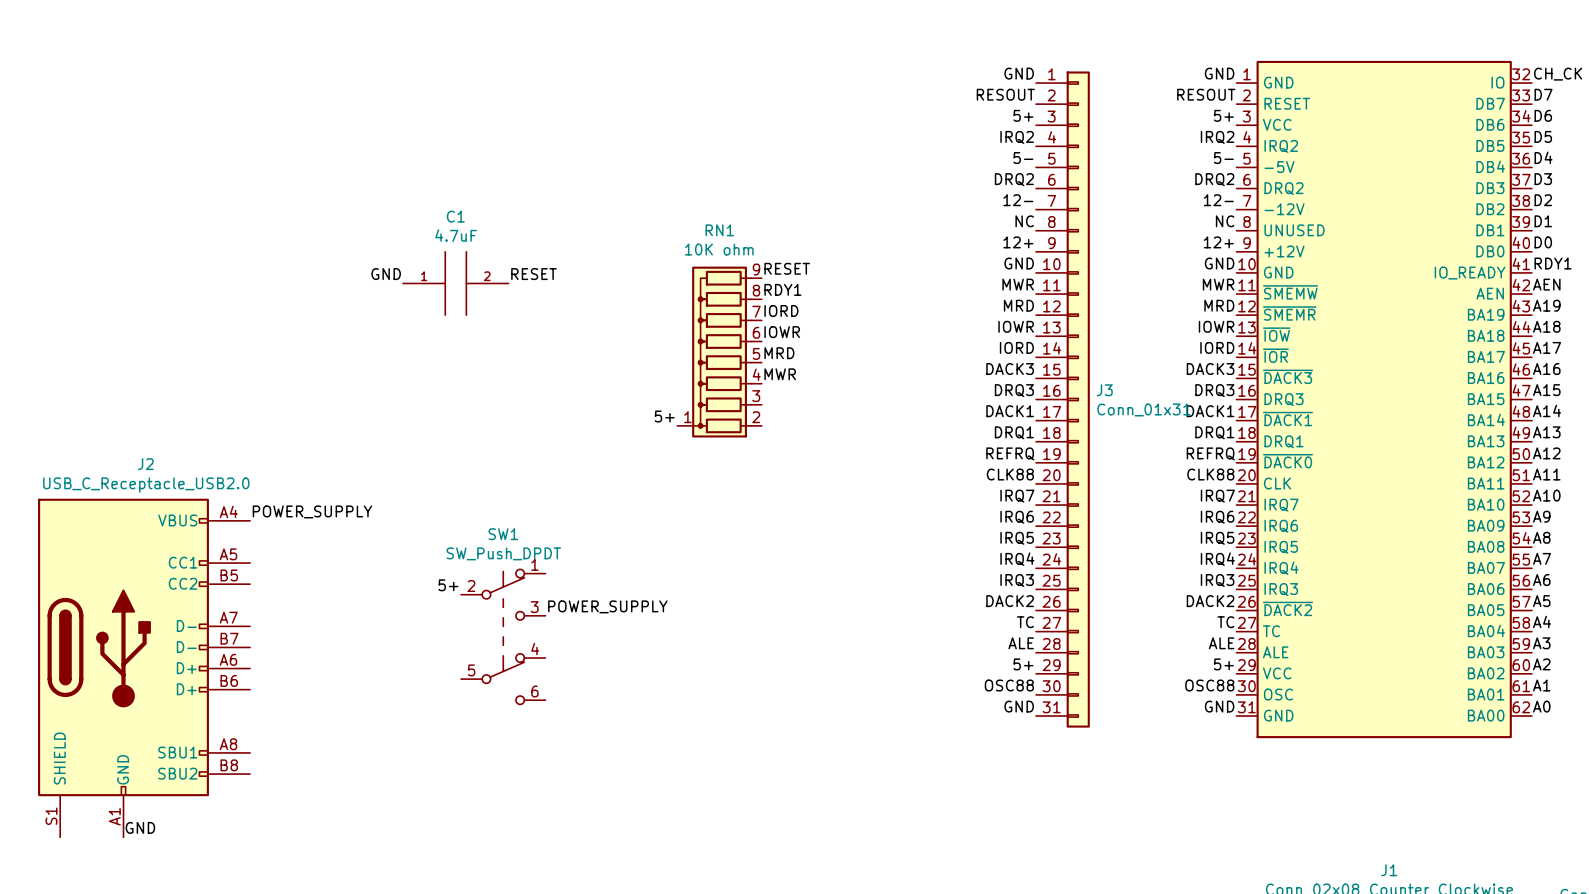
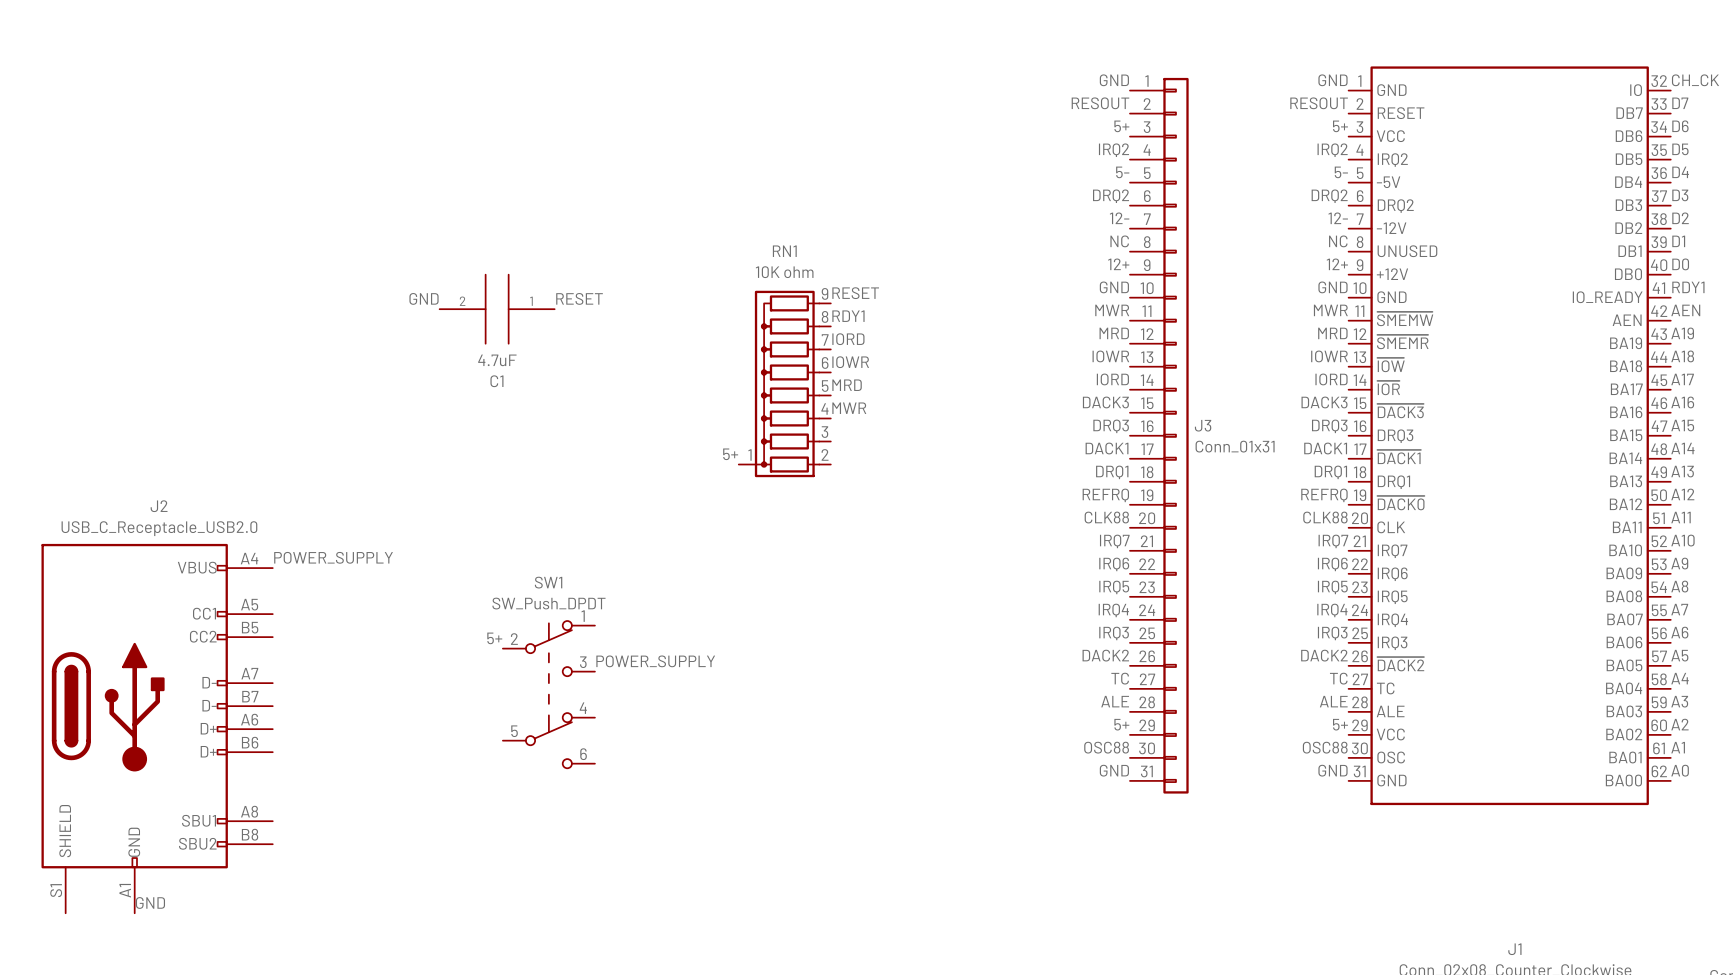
C1 rotation: 0° (455, 283) -> 180° (497, 309)

